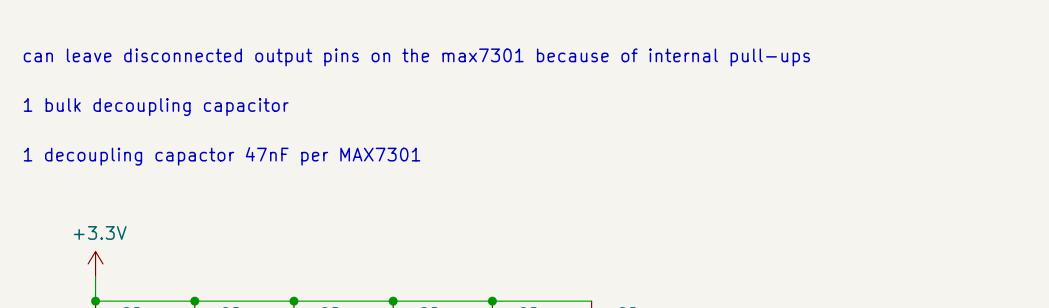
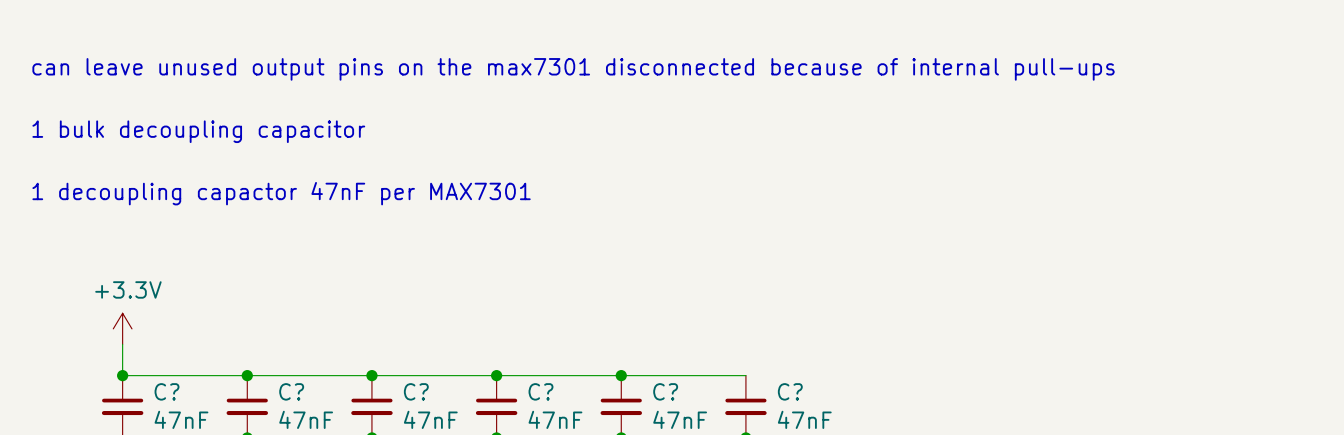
text: can leave disconnected output pins on the max7301 because of internal pull-ups (416, 57) -> can leave unused output pins on the max7301 disconnected because of internal pull-ups (573, 69)

